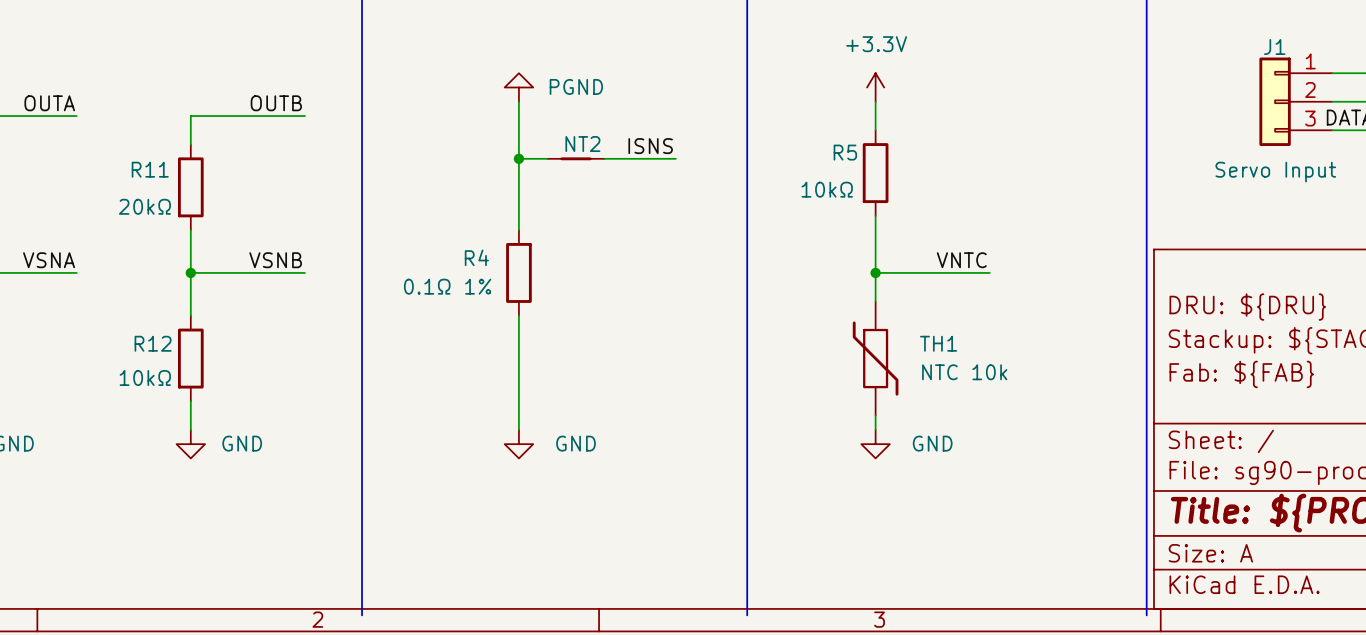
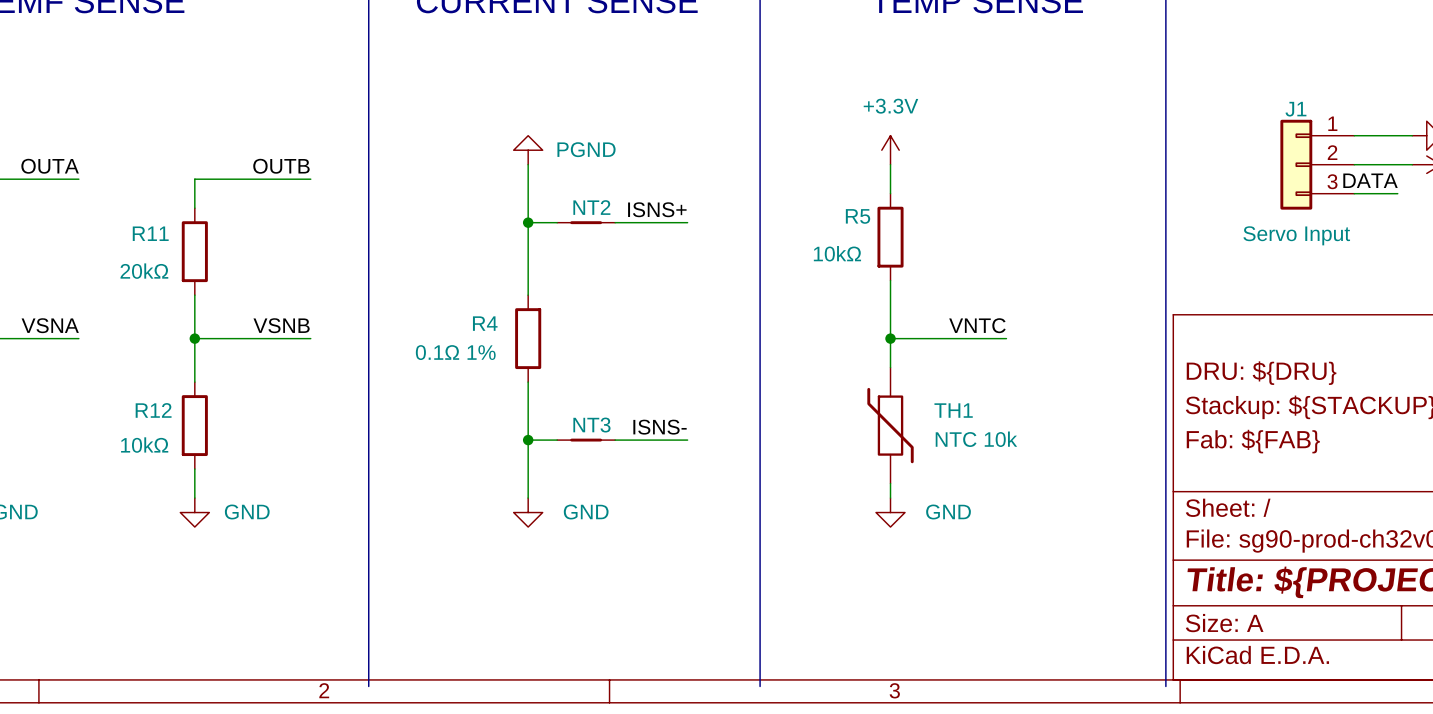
label: ISNS (650, 146) -> ISNS+ (657, 209)
label: none -> ISNS- (660, 427)
wire: none -> (528, 440) (557, 440)
junction: none -> (528, 440)
NT3: none -> (586, 440)
wire: none -> (615, 440) (687, 440)

